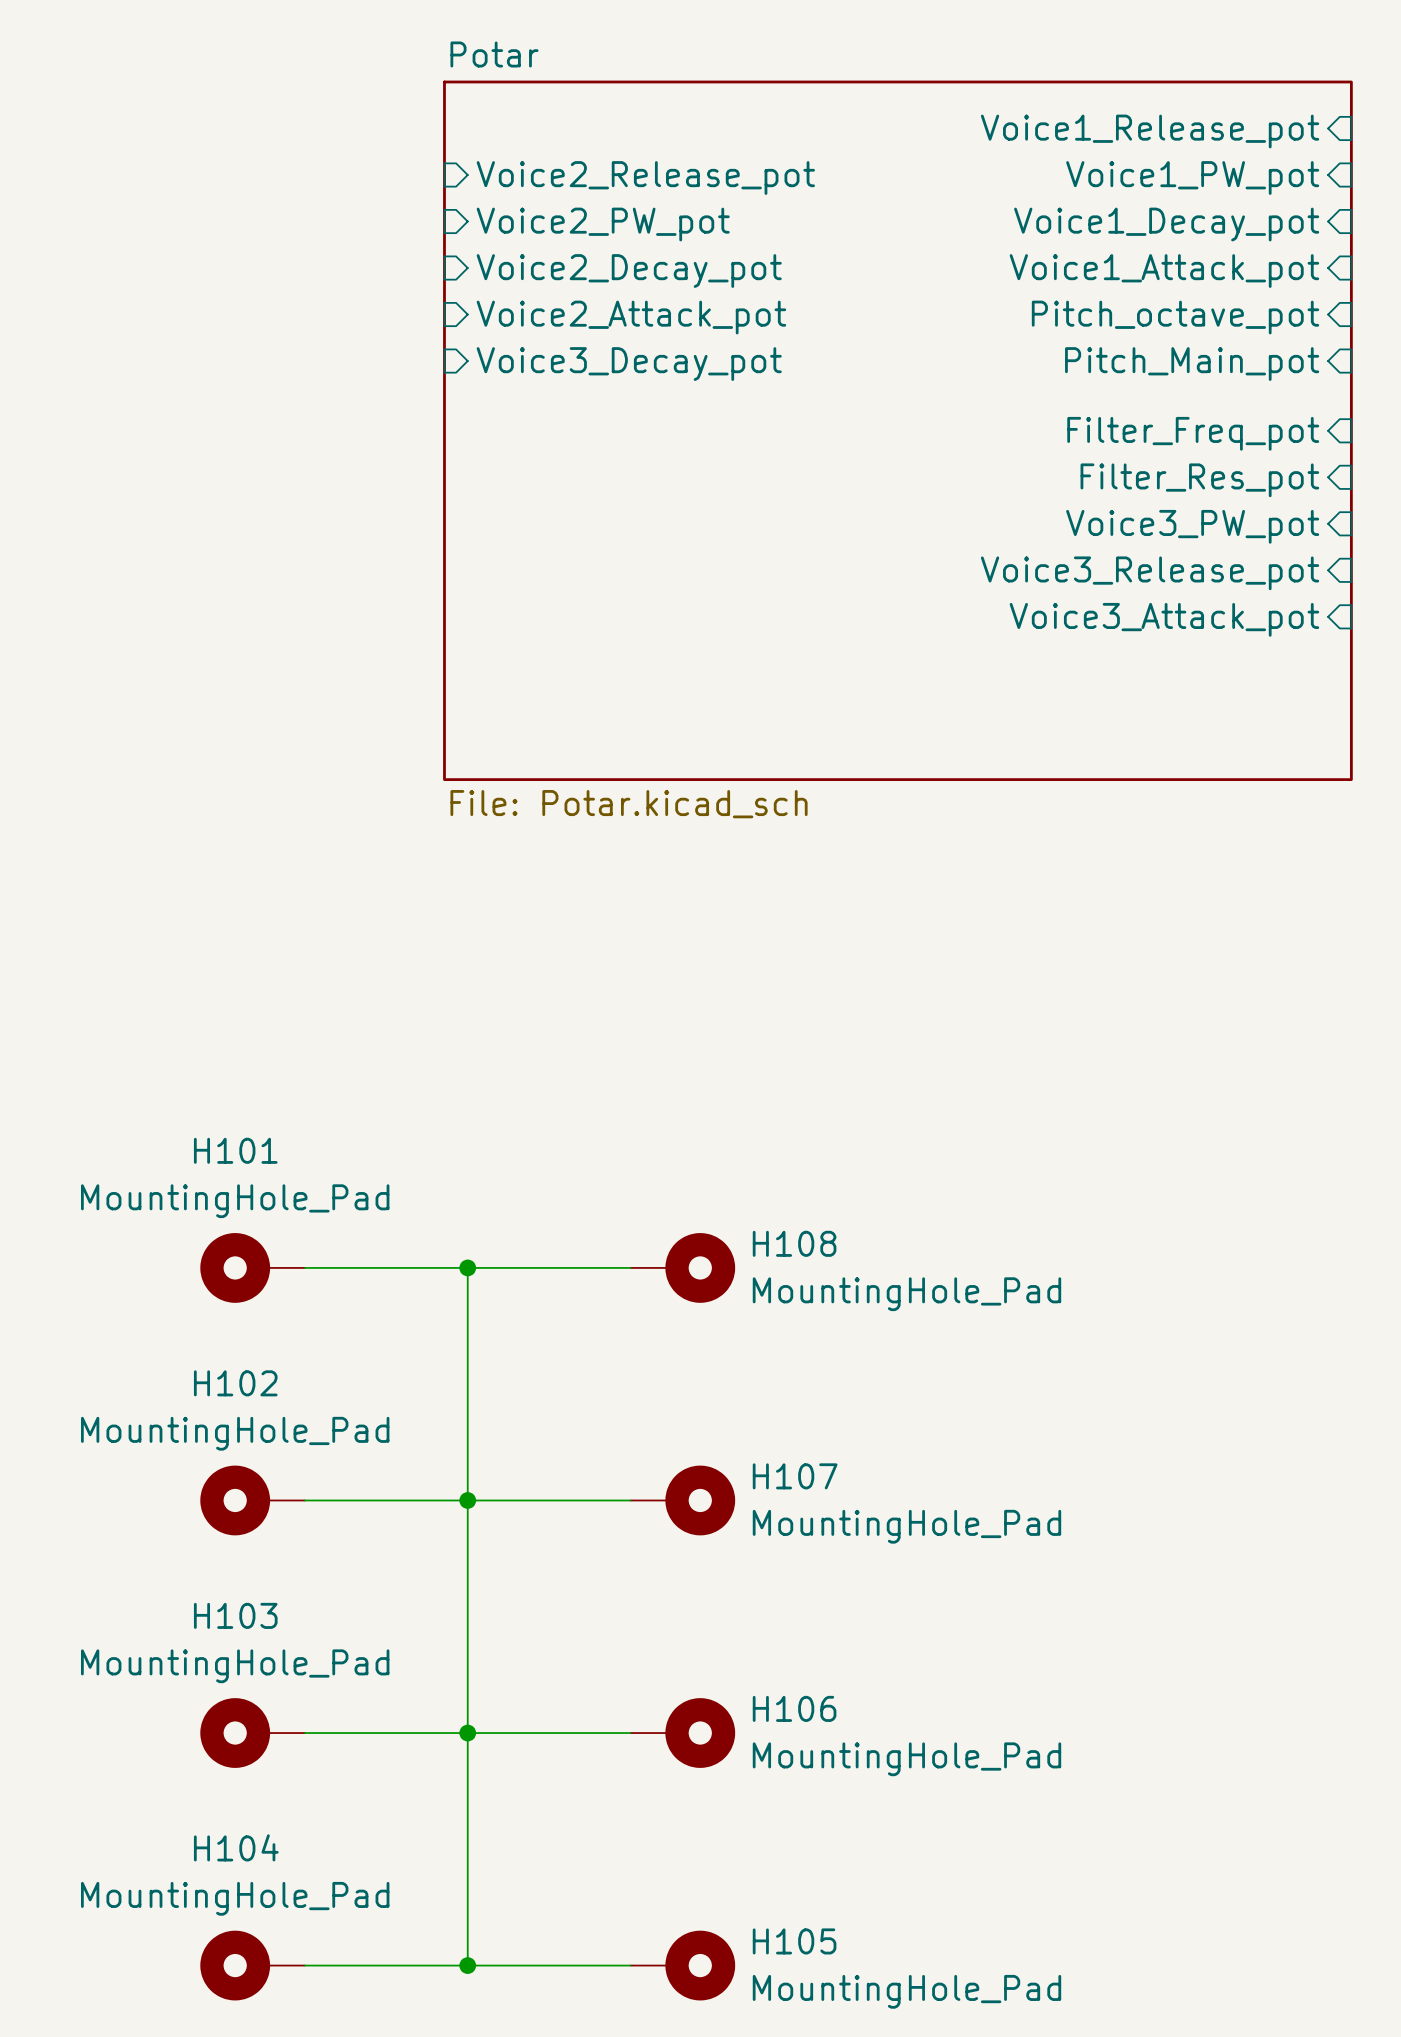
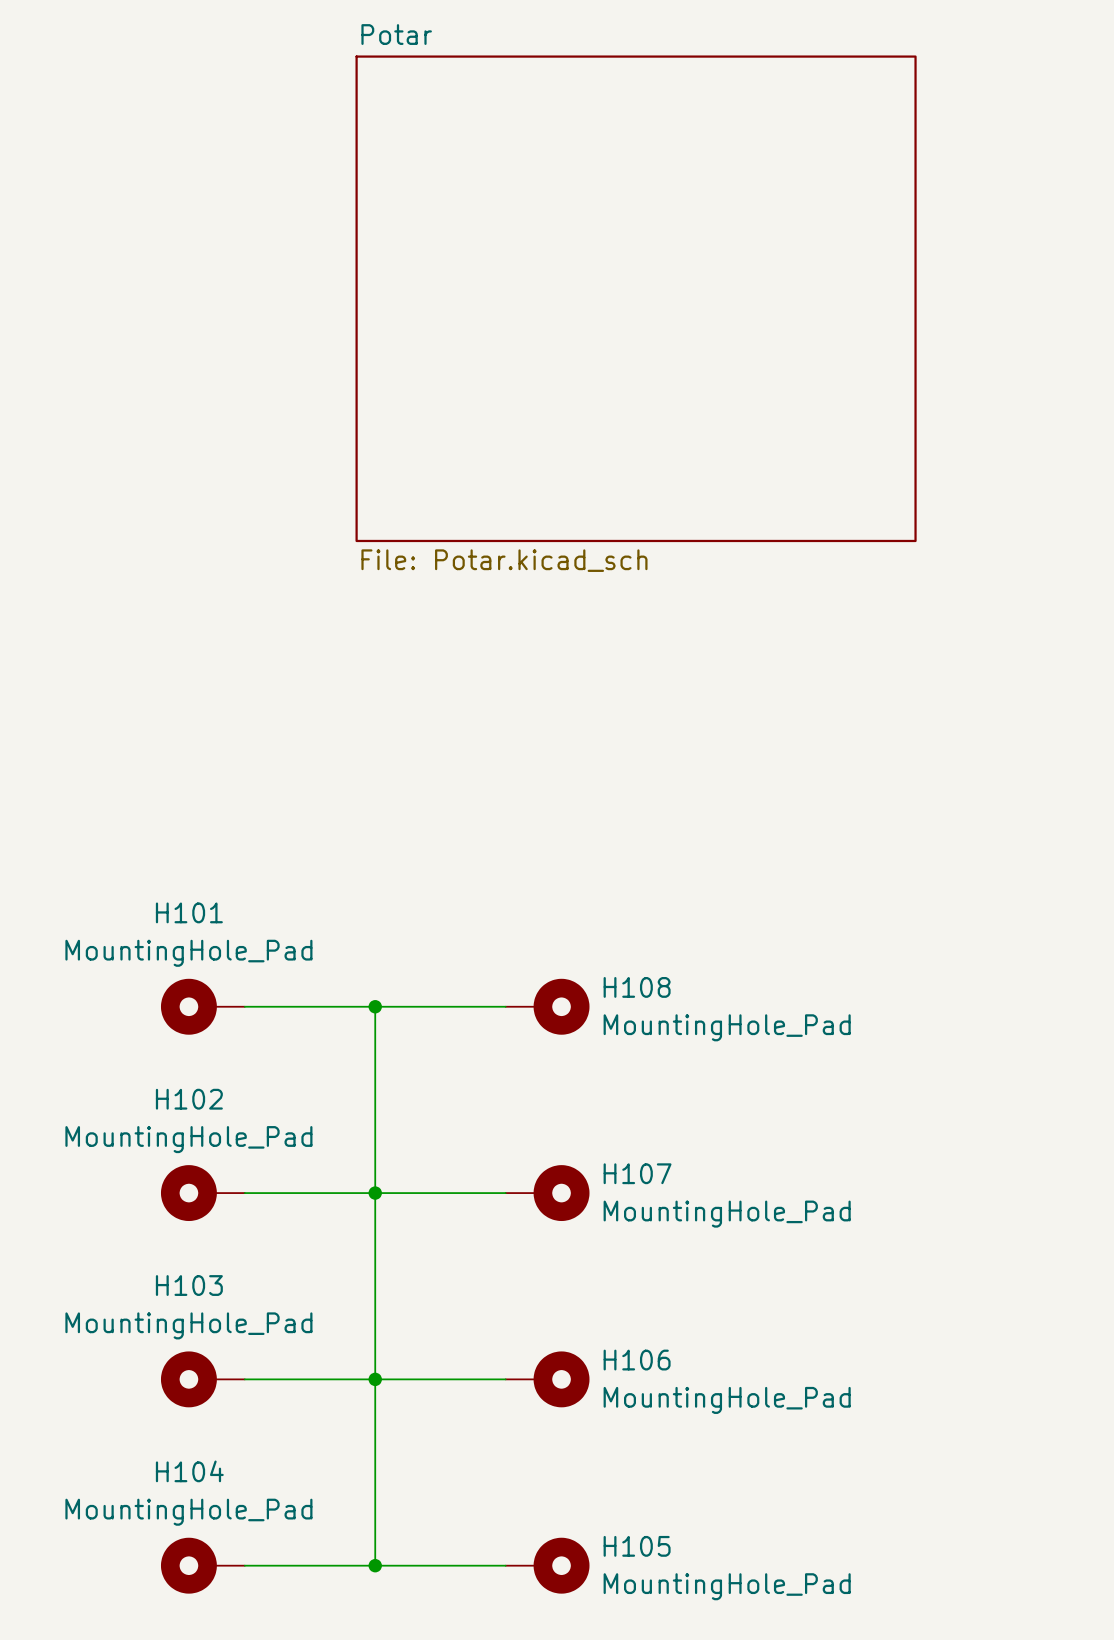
sheet pin: Voice1_Release_pot (1150, 131) -> none
sheet pin: Voice2_Release_pot (645, 178) -> none
sheet pin: Voice1_PW_pot (1192, 178) -> none
sheet pin: Voice2_PW_pot (603, 224) -> none
sheet pin: Voice1_Decay_pot (1166, 224) -> none
sheet pin: Voice2_Decay_pot (629, 271) -> none
sheet pin: Voice1_Attack_pot (1164, 271) -> none
sheet pin: Voice2_Attack_pot (631, 317) -> none
sheet pin: Pitch_octave_pot (1175, 317) -> none
sheet pin: Voice3_Decay_pot (629, 364) -> none
sheet pin: Pitch_Main_pot (1192, 364) -> none
sheet Potar: none -> File: Potar.kicad_sch (636, 298)
sheet Potar: File: Potar.kicad_sch (897, 430) -> none
sheet pin: Filter_Freq_pot (1193, 433) -> none
sheet pin: Filter_Res_pot (1199, 480) -> none
sheet pin: Voice3_PW_pot (1192, 526) -> none
sheet pin: Voice3_Release_pot (1150, 573) -> none
sheet pin: Voice3_Attack_pot (1164, 619) -> none

